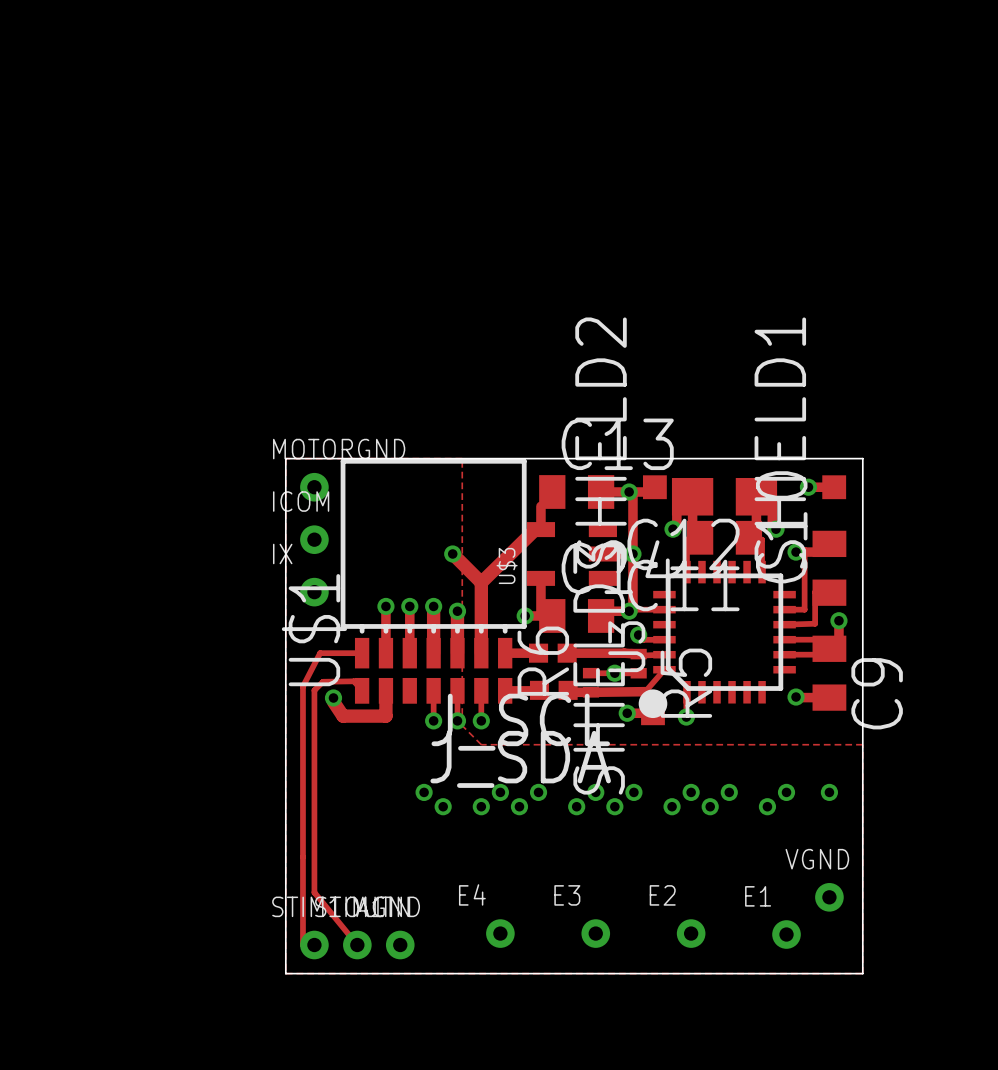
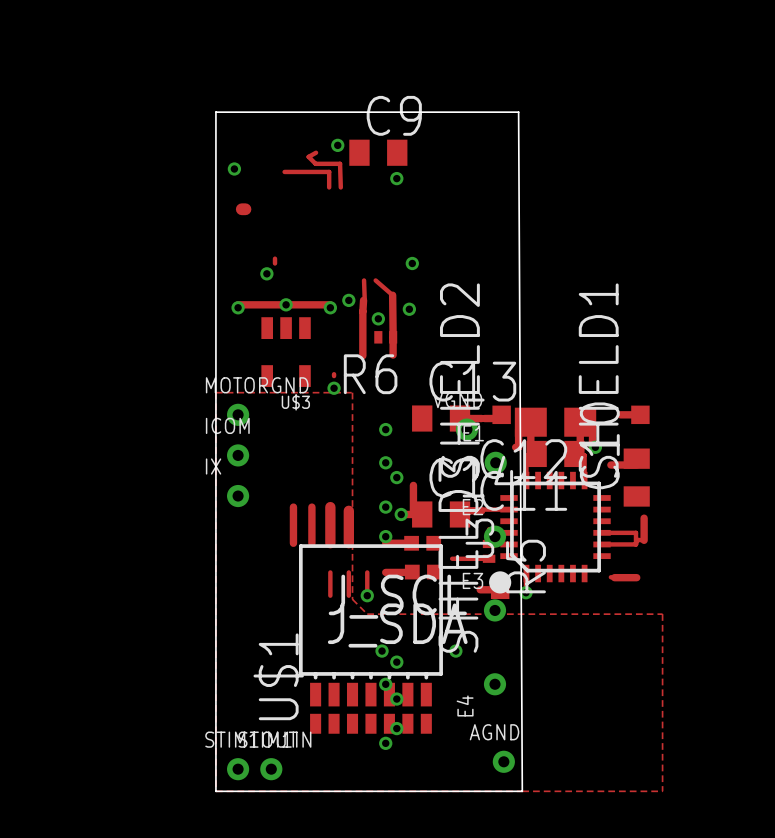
via: none -> (337, 145)
track: none -> (316, 152) (308, 156) (315, 163) (340, 163) (340, 187)
via: none -> (234, 168)
track: none -> (284, 171) (329, 171) (329, 187)
via: none -> (396, 178)
track: none -> (241, 209) (245, 209)
track: none -> (275, 258) (275, 263)
via: none -> (412, 263)
via: none -> (266, 273)
track: none -> (364, 280) (362, 355)
track: none -> (375, 280) (392, 295) (391, 355)
via: none -> (348, 300)
track: none -> (238, 304) (330, 304) (330, 307)
via: none -> (286, 304)
via: none -> (238, 307)
via: none -> (330, 307)
via: none -> (409, 309)
via: none -> (378, 318)
track: none -> (334, 374) (334, 376)
via: none -> (334, 388)
board edge: (285, 458) (862, 458) (862, 973) (681, 973) -> (215, 392) (215, 112) (518, 112) (522, 791)
via: (808, 487) -> none
track: (552, 491) (540, 506) (540, 529) (534, 530) (481, 582) -> none
via: (629, 491) -> none
track: (632, 491) (632, 611) (629, 611) -> none
via: none -> (385, 429)
via: (673, 529) -> none
via: none -> (385, 462)
via: (796, 552) -> none
track: (804, 552) (804, 609) (784, 609) -> none
track: (452, 553) (481, 582) -> none
via: (452, 553) -> none
U$3 rotation: 0° (571, 553) -> 90° counterclockwise (286, 352)
U$3 position: (571, 553) -> (286, 352)
via: (632, 553) -> none
via: none -> (396, 477)
U$1 position: (433, 581) -> (370, 638)
track: (481, 582) (481, 653) (481, 620) -> none
track: (829, 592) (824, 583) (815, 592) (815, 623) (784, 624) -> none
via: (385, 606) -> none
via: (409, 606) -> none
via: (433, 606) -> none
via: none -> (385, 507)
via: (457, 611) -> none
via: (629, 611) -> none
via: (838, 620) -> none
via: (638, 635) -> none
via: none -> (385, 536)
track: (362, 653) (320, 653) (302, 686) (302, 945) (314, 945) -> none
track: (567, 653) (664, 654) -> none
R6 name position: R6 (543, 661) -> R6 (370, 374)
track: (664, 669) (645, 691) (568, 692) (568, 690) -> none
via: (614, 673) -> none
C9 rotation: 0° (829, 673) -> 90° clockwise (378, 152)
C9 position: (829, 673) -> (378, 152)
R6 rotation: 0° (591, 682) -> 90° clockwise (385, 337)
R6 position: (591, 682) -> (385, 337)
track: (362, 690) (354, 681) (323, 681) (314, 690) (314, 892) (357, 945) -> none
track: (385, 690) (385, 716) (343, 716) (333, 701) (333, 697) -> none
C9 name position: C9 (877, 693) -> C9 (394, 115)
via: (333, 697) -> none
via: (796, 697) -> none
via: (627, 713) -> none
via: (433, 720) -> none
via: (457, 720) -> none
via: (424, 792) -> none
via: (538, 792) -> none
via: (633, 792) -> none
via: (691, 792) -> none
via: (729, 792) -> none
via: (786, 792) -> none
via: (829, 792) -> none
via: (443, 806) -> none
via: (481, 806) -> none
via: (576, 806) -> none
via: (614, 806) -> none
via: (672, 806) -> none
via: (710, 806) -> none
via: (767, 806) -> none
via: none -> (385, 684)
via: none -> (396, 699)
via: none -> (396, 728)
E4 name rotation: 0° (472, 894) -> 90° counterclockwise (465, 705)
E4 name position: E4 (472, 894) -> E4 (465, 705)
VGND position: (829, 897) -> (466, 429)
via: none -> (385, 743)
E4 position: (500, 933) -> (494, 684)
E3 position: (595, 933) -> (494, 610)
E2 position: (691, 933) -> (494, 536)
E1 position: (786, 934) -> (495, 462)
AGND position: (400, 945) -> (503, 761)

